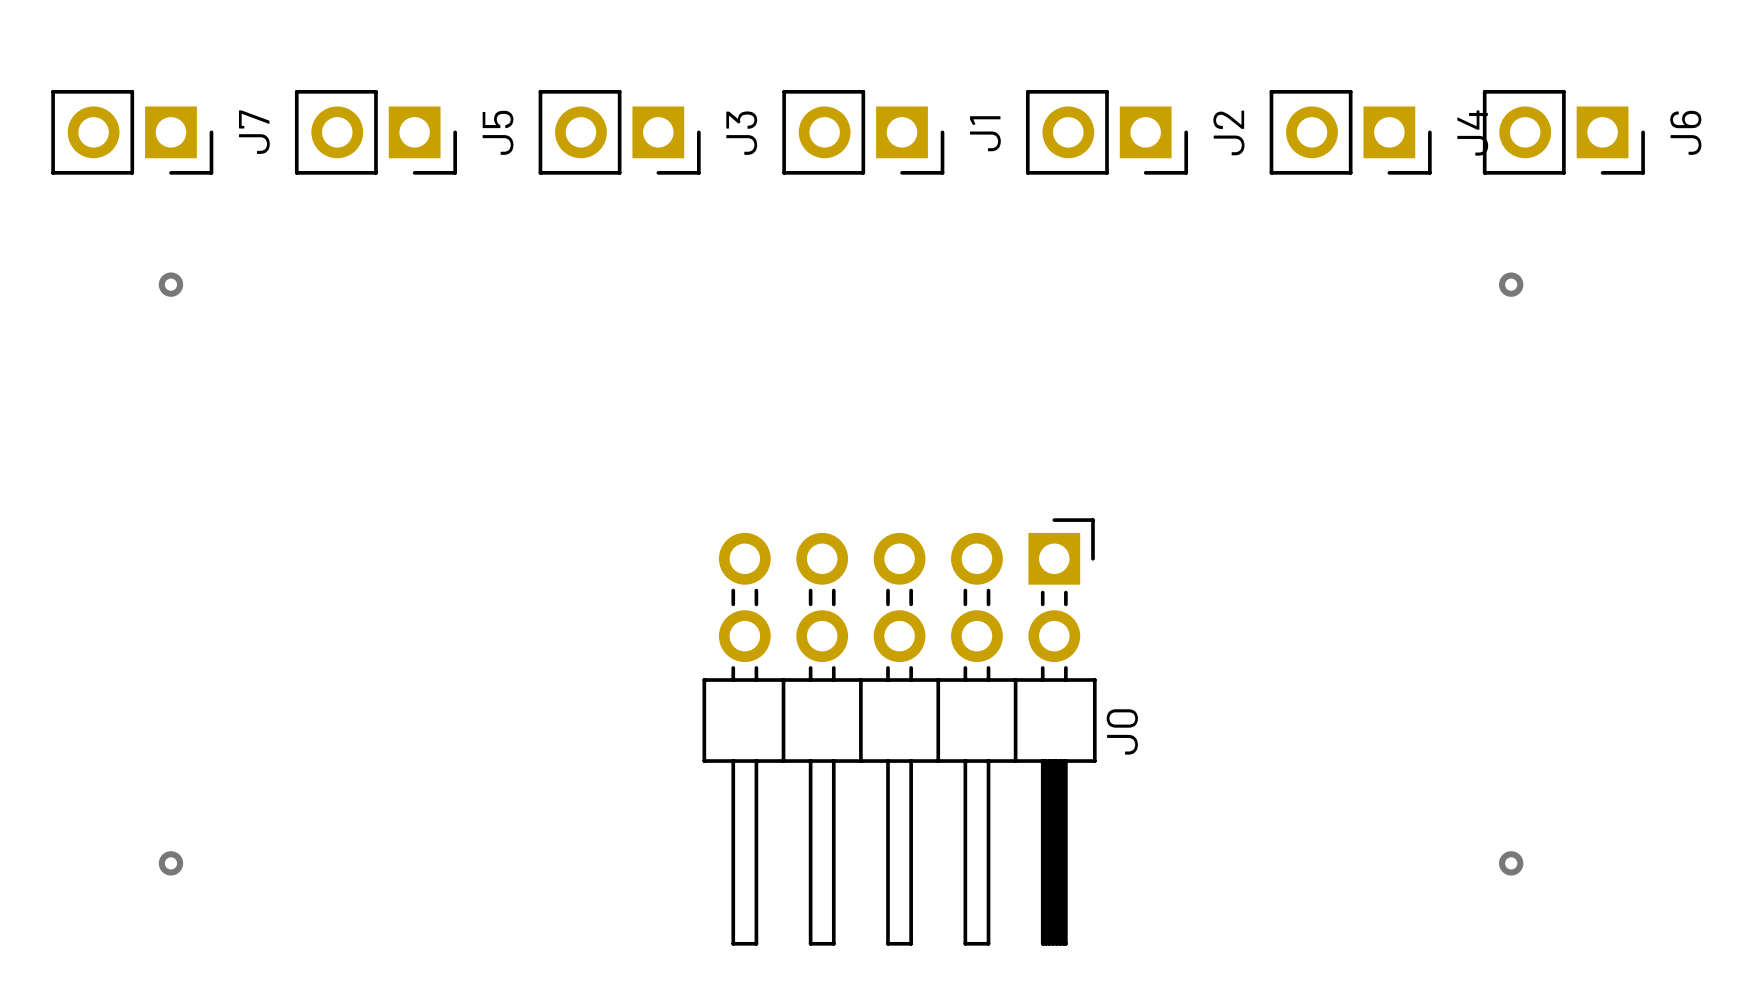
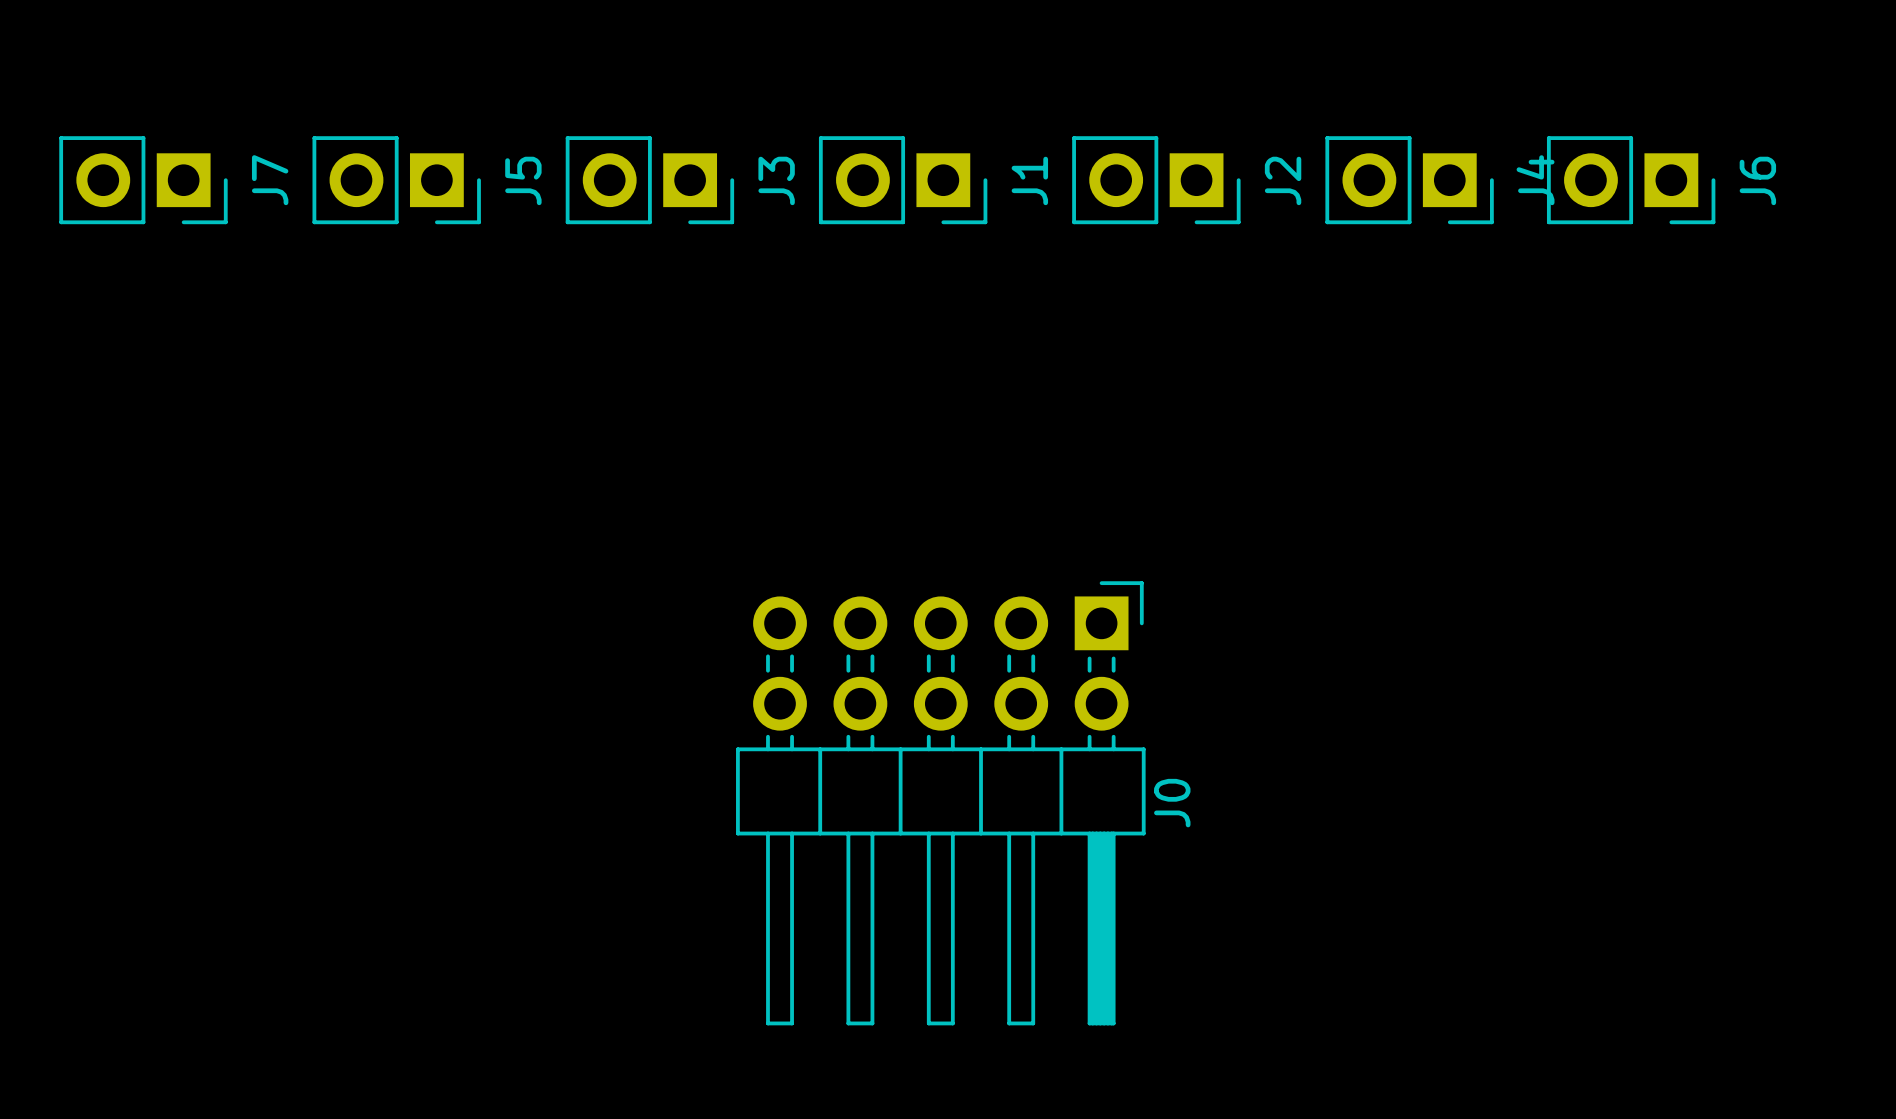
via: (170, 284) -> none
via: (1511, 284) -> none
via: (170, 863) -> none
via: (1511, 863) -> none

